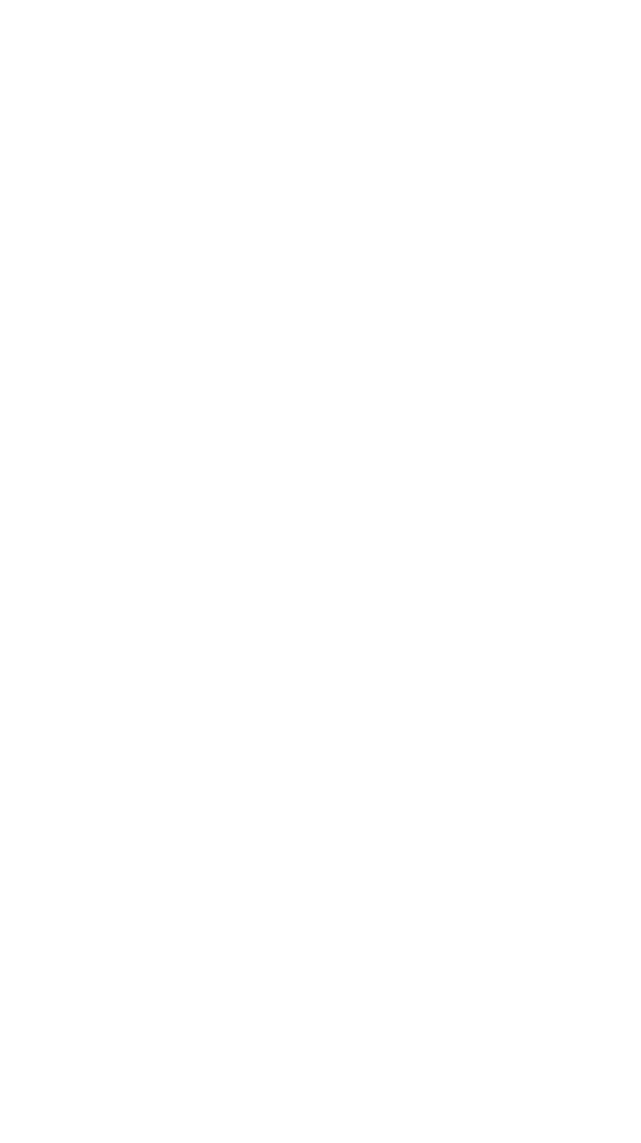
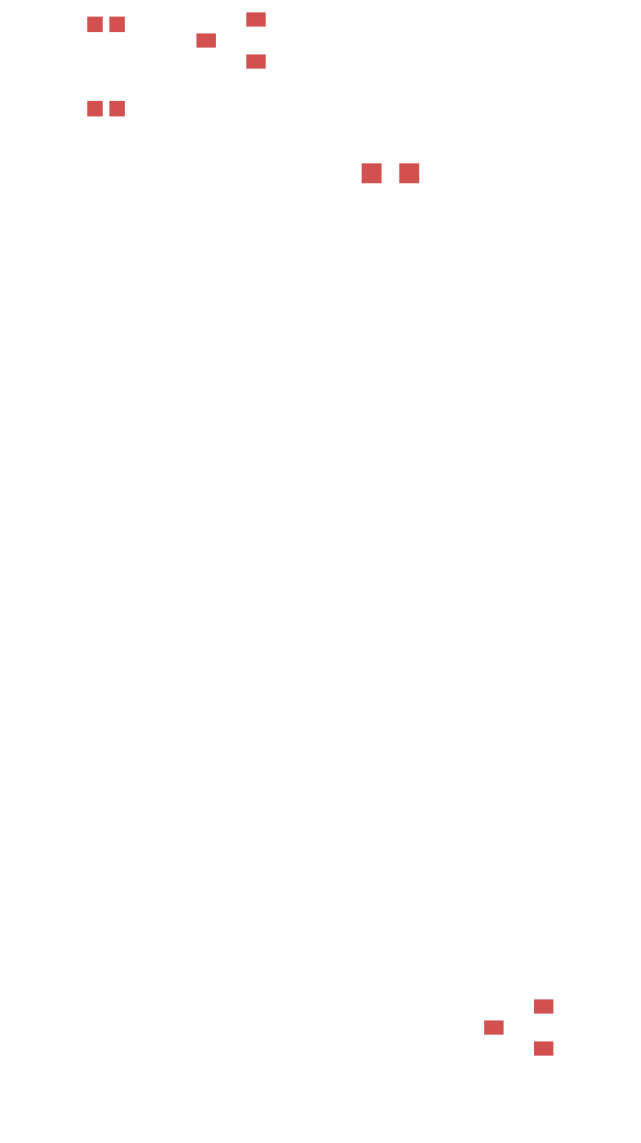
part: none -> (106, 24)
part: none -> (231, 40)
part: none -> (106, 108)
part: none -> (390, 173)
part: none -> (518, 1027)

